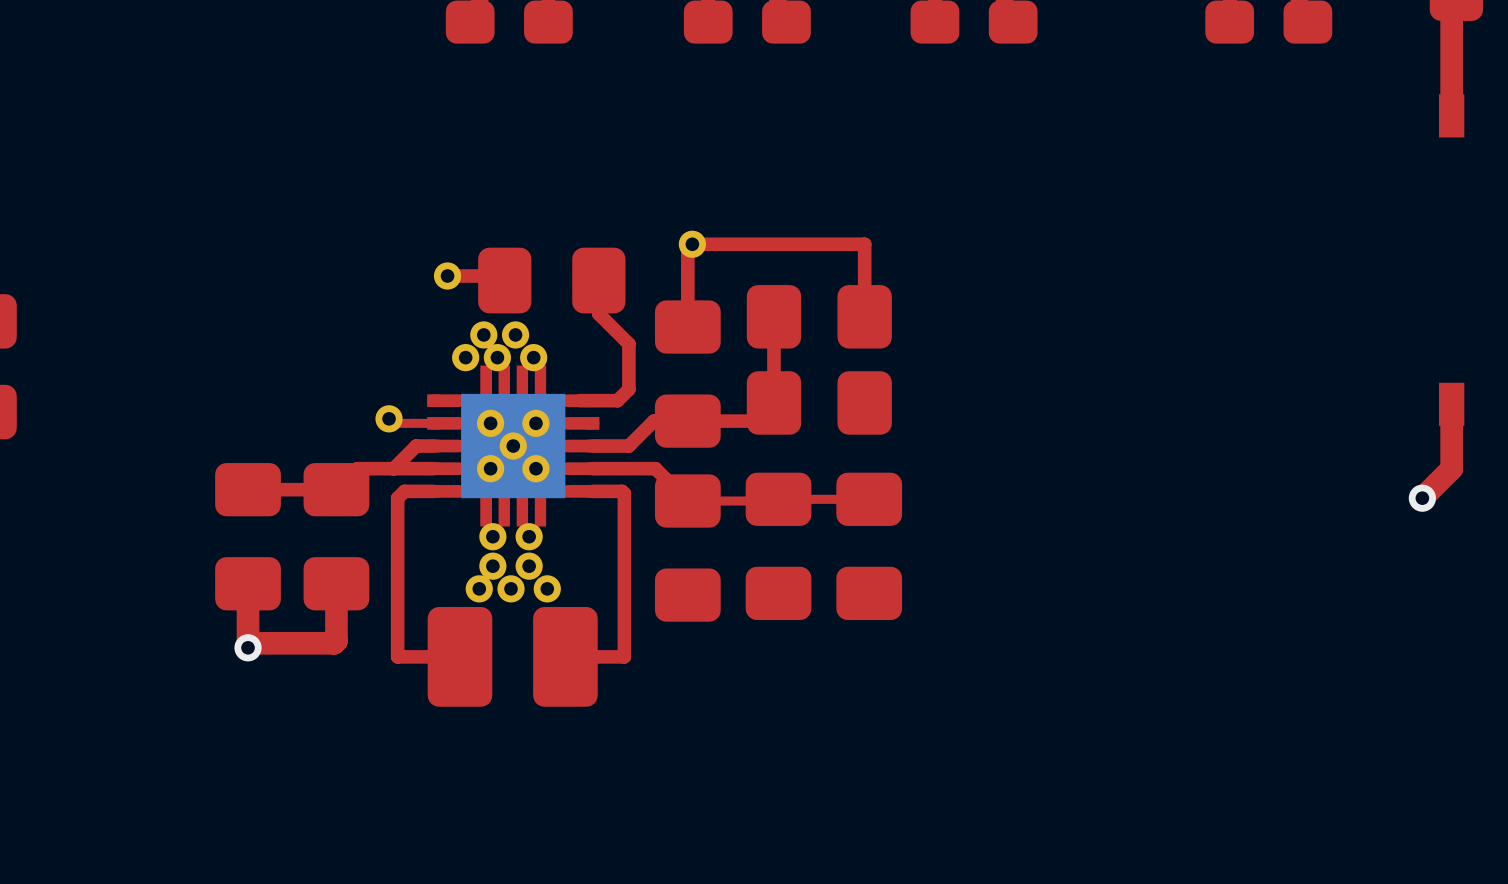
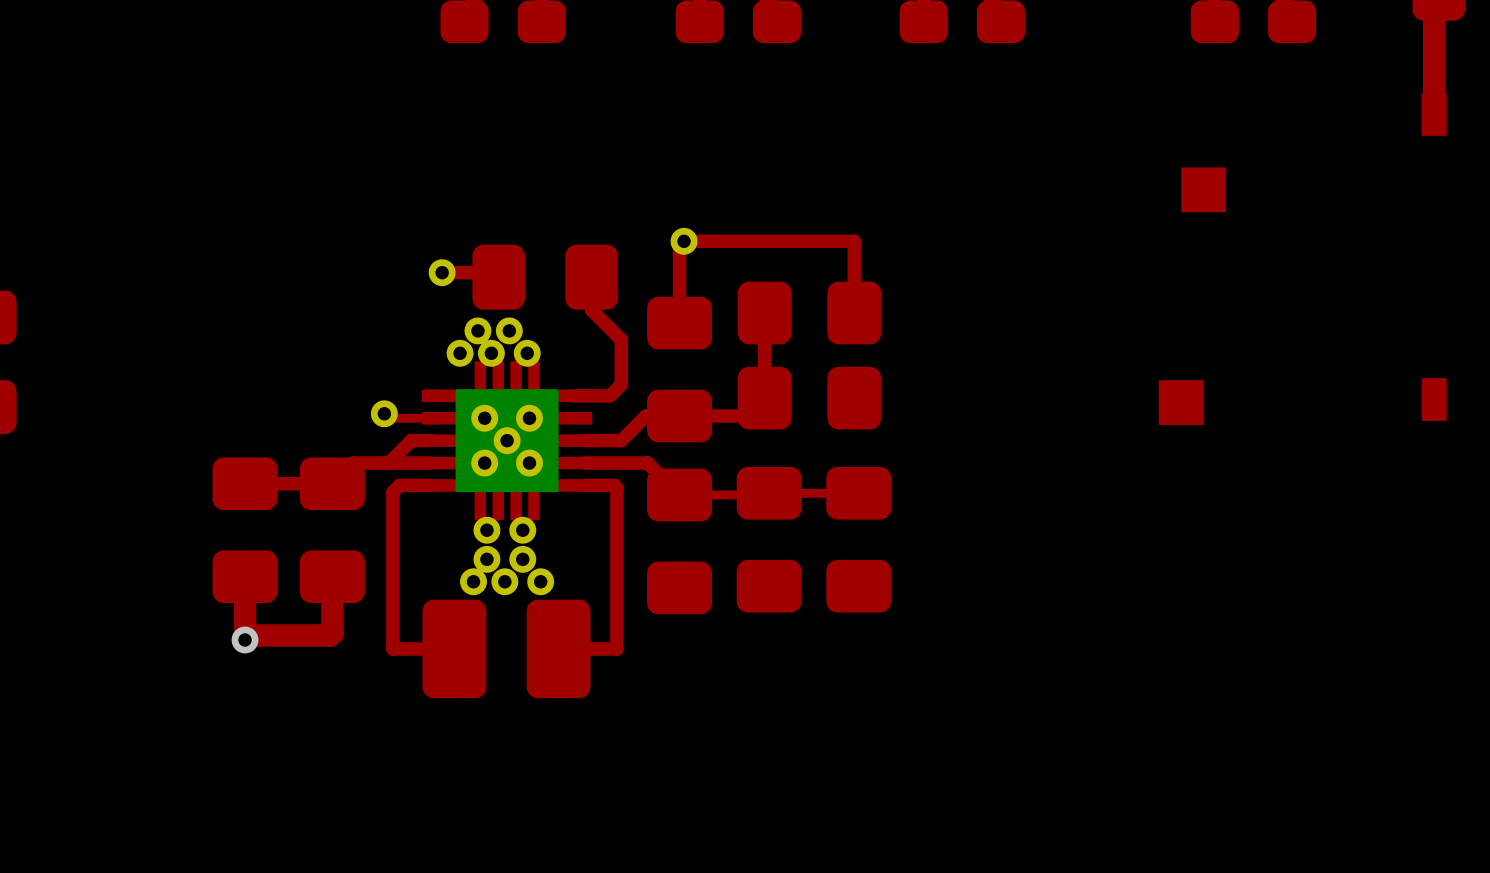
part: none -> (1203, 189)
top track: (1451, 404) (1451, 468) (1422, 498) -> none
part: none -> (1181, 402)
via: (1422, 498) -> none

